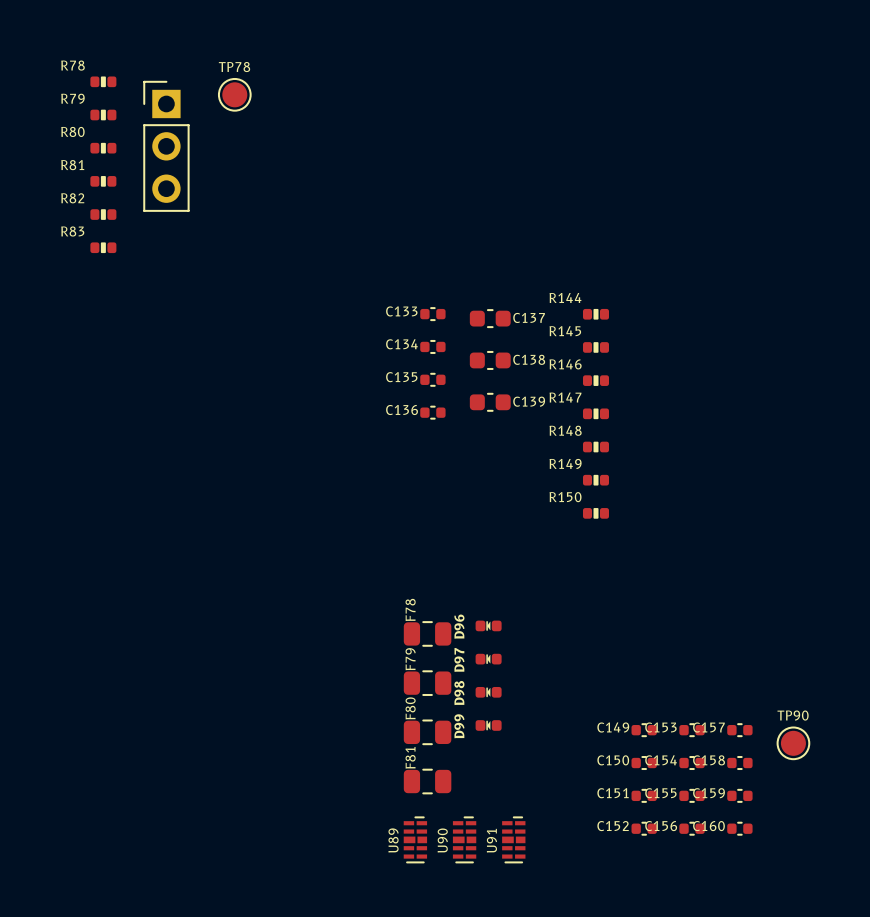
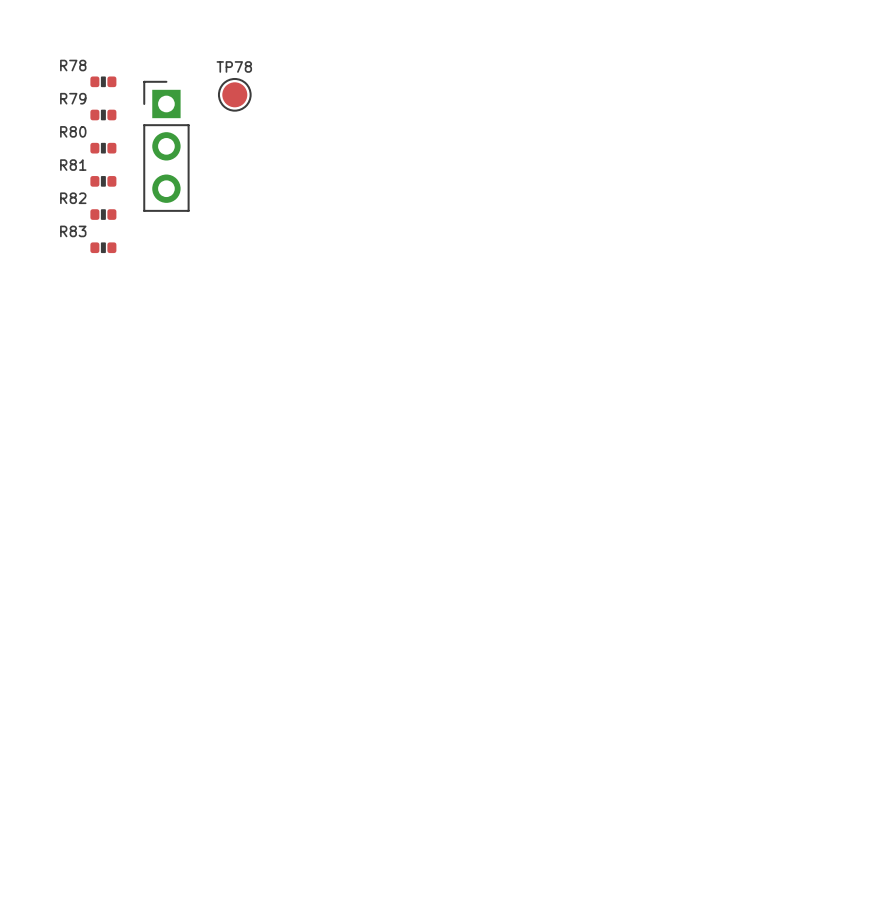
C133: (432, 314) -> none
R144: (595, 314) -> none
C137: (490, 318) -> none
C134: (432, 346) -> none
R145: (595, 347) -> none
C138: (490, 360) -> none
C135: (432, 379) -> none
R146: (595, 380) -> none
C139: (490, 402) -> none
C136: (432, 412) -> none
R147: (595, 413) -> none
R148: (595, 447) -> none
R149: (595, 480) -> none
R150: (595, 513) -> none
D96: (488, 625) -> none
F78: (427, 633) -> none
D97: (488, 659) -> none
F79: (427, 683) -> none
D98: (488, 692) -> none
D99: (488, 725) -> none
C149: (644, 730) -> none
C153: (692, 730) -> none
C157: (739, 730) -> none
F80: (427, 732) -> none
TP90: (793, 743) -> none
C150: (644, 763) -> none
C154: (692, 763) -> none
C158: (739, 763) -> none
F81: (427, 781) -> none
C151: (644, 795) -> none
C155: (692, 795) -> none
C159: (739, 795) -> none
C152: (644, 828) -> none
C156: (692, 828) -> none
C160: (739, 828) -> none
U89: (415, 839) -> none
U90: (464, 839) -> none
U91: (513, 839) -> none

